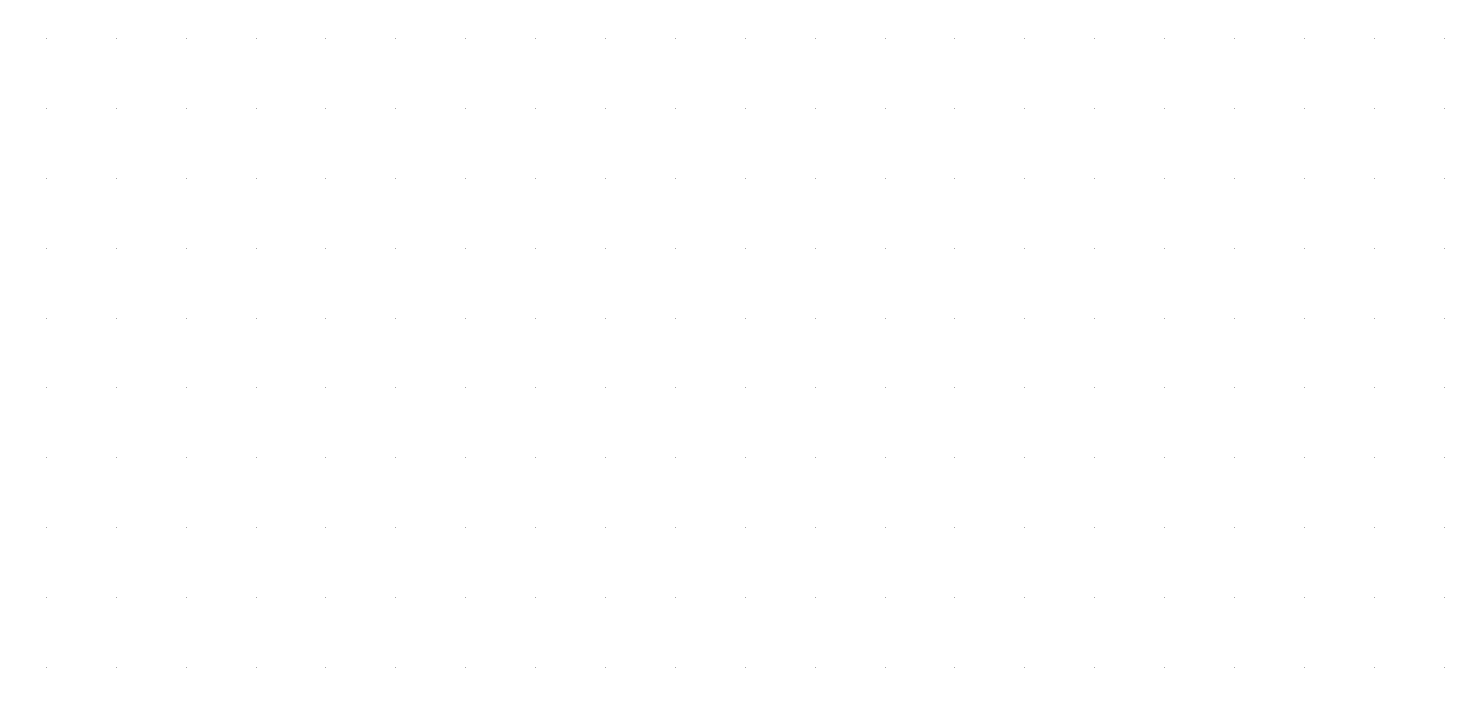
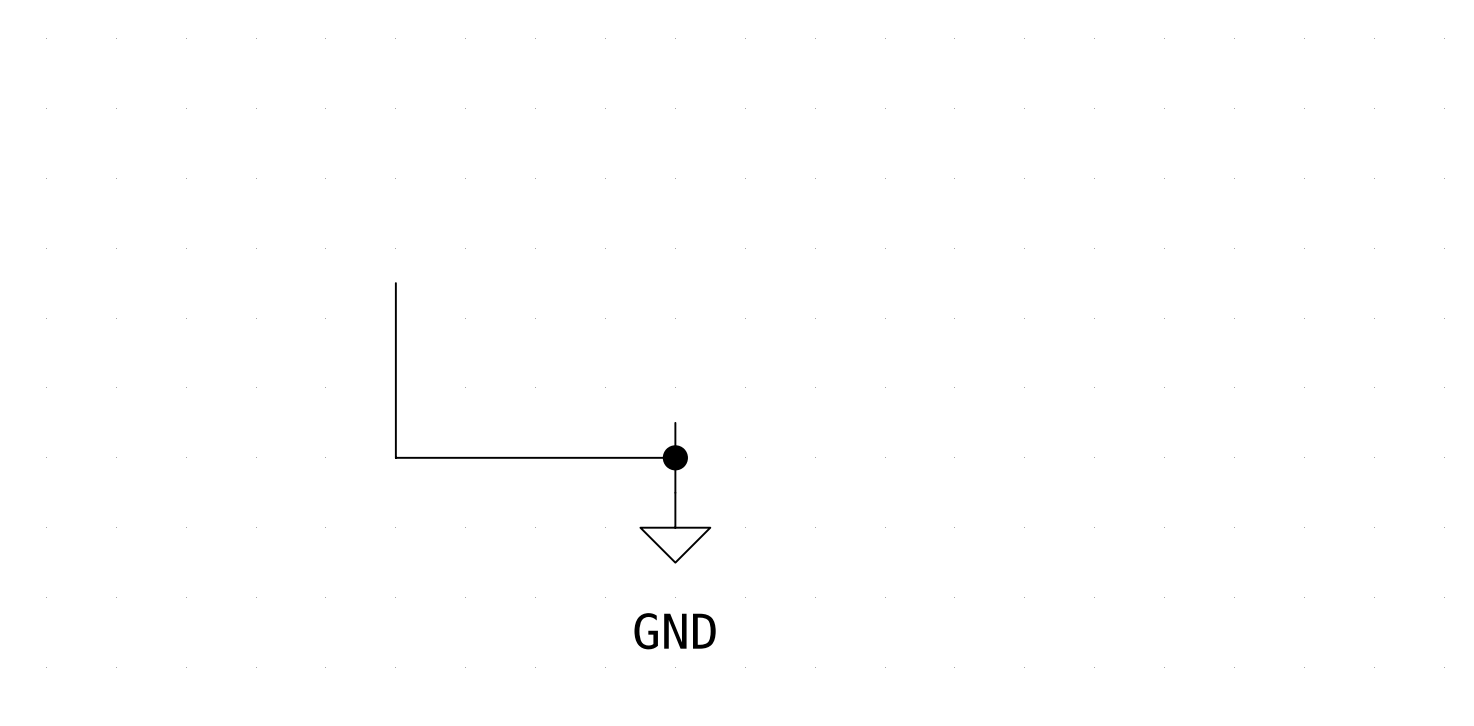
wire: none -> (395, 283) (395, 457) (675, 457)
wire: none -> (675, 422) (675, 492)
junction: none -> (675, 457)
power symbol: none -> GND (675, 527)

